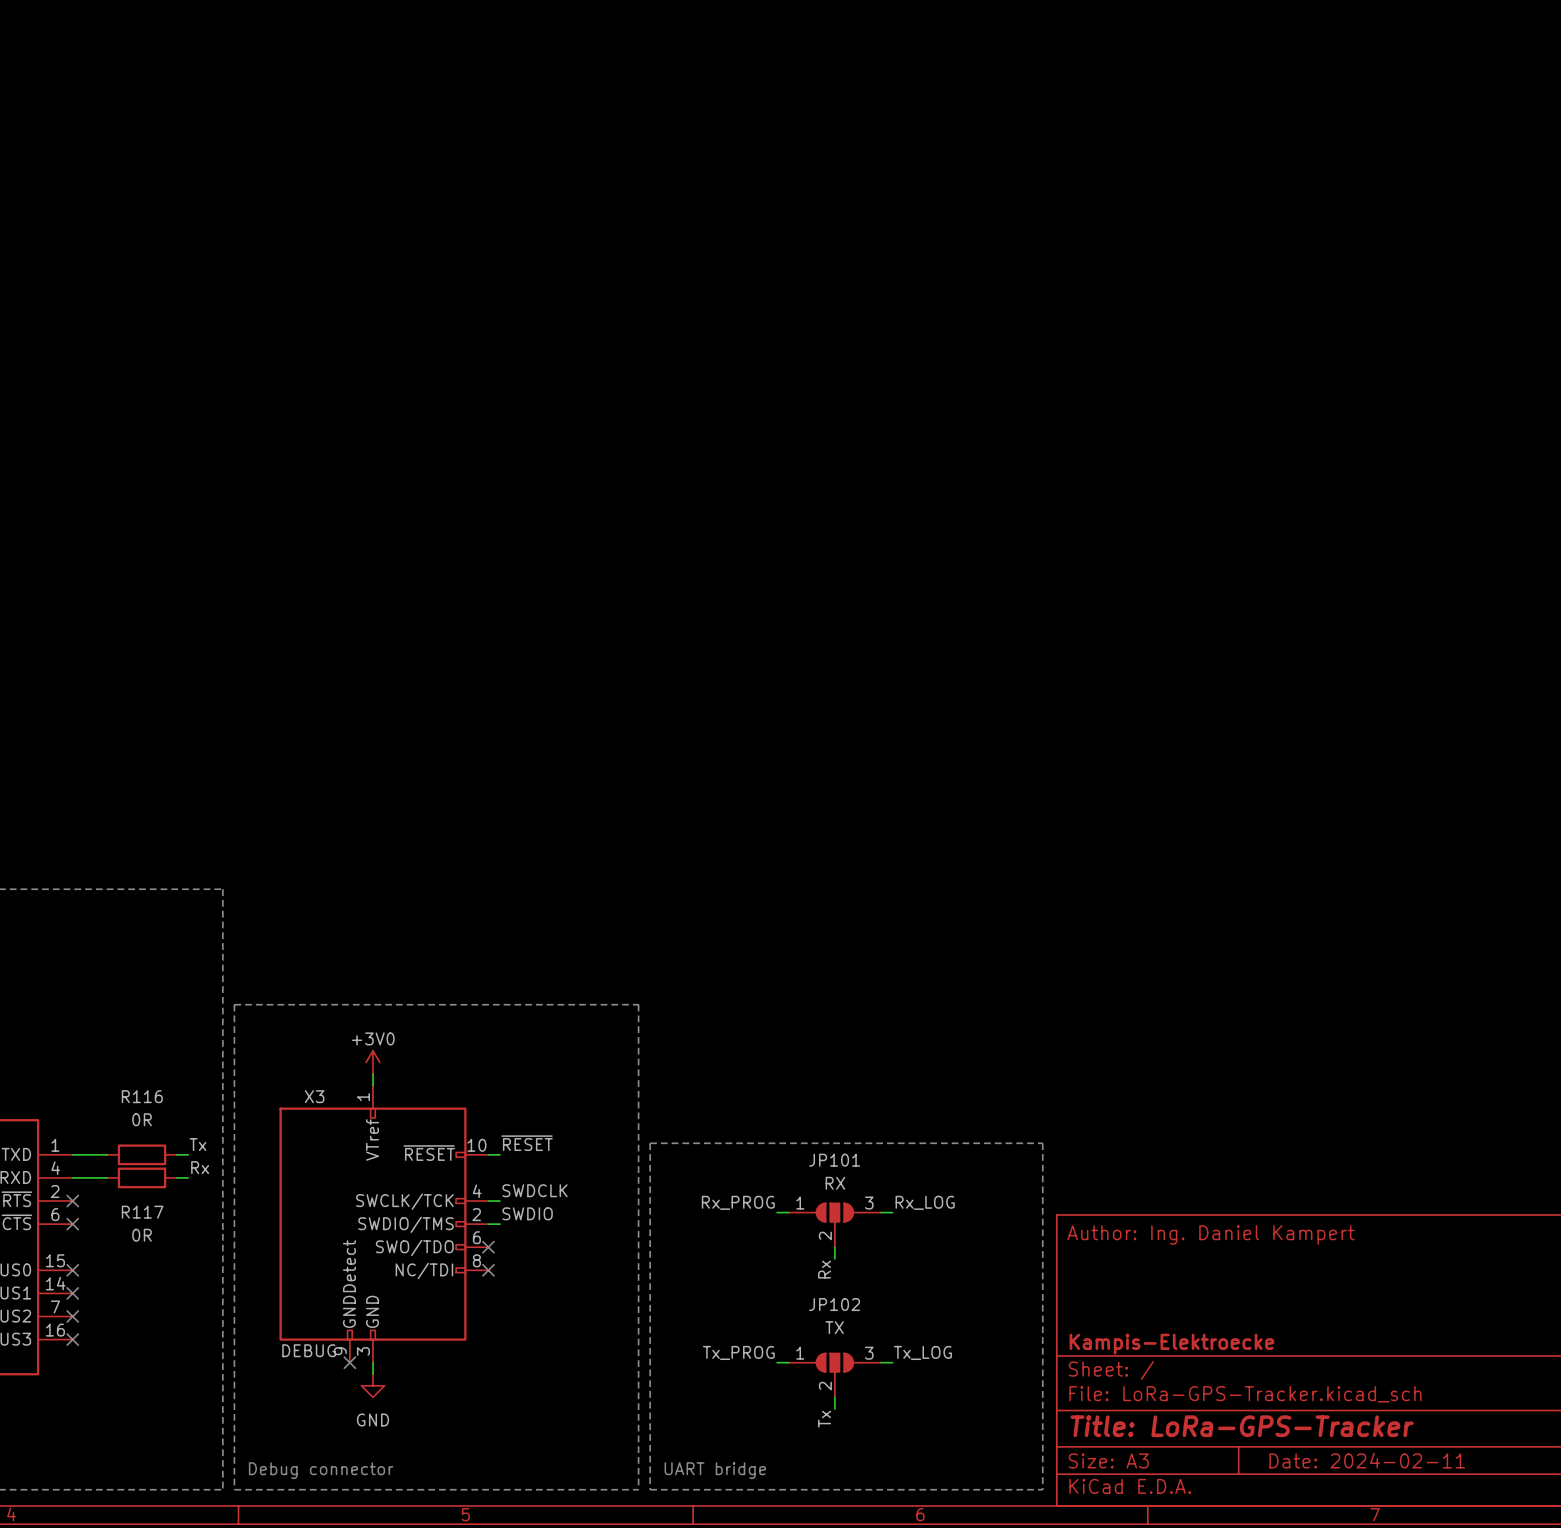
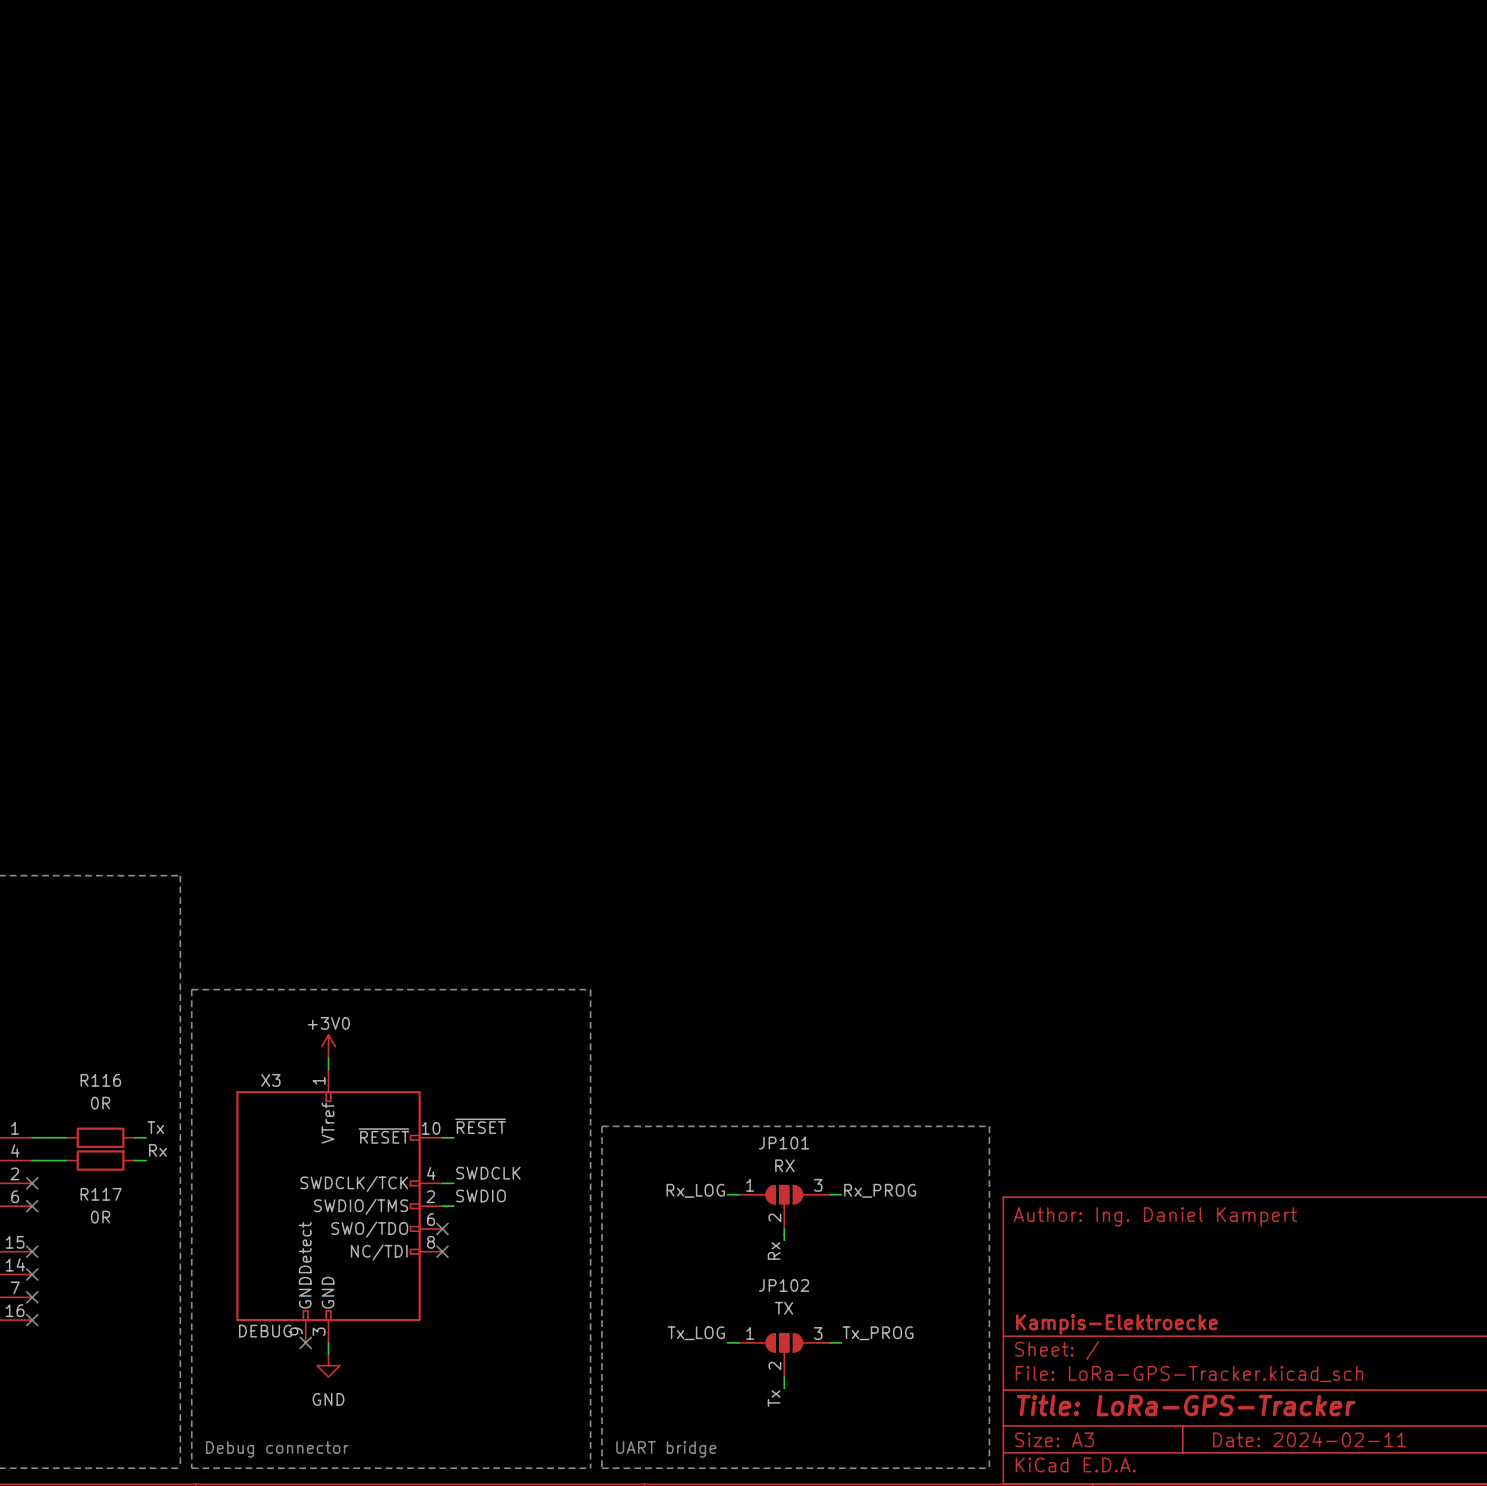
X3 pin name: SWCLK/TCK (404, 1201) -> SWDCLK/TCK (354, 1184)
label: Rx_PROG (738, 1202) -> Rx_LOG (695, 1190)
label: Rx_LOG (925, 1202) -> Rx_PROG (880, 1190)
label: Tx_PROG (738, 1352) -> Tx_LOG (696, 1333)
label: Tx_LOG (922, 1352) -> Tx_PROG (878, 1333)

